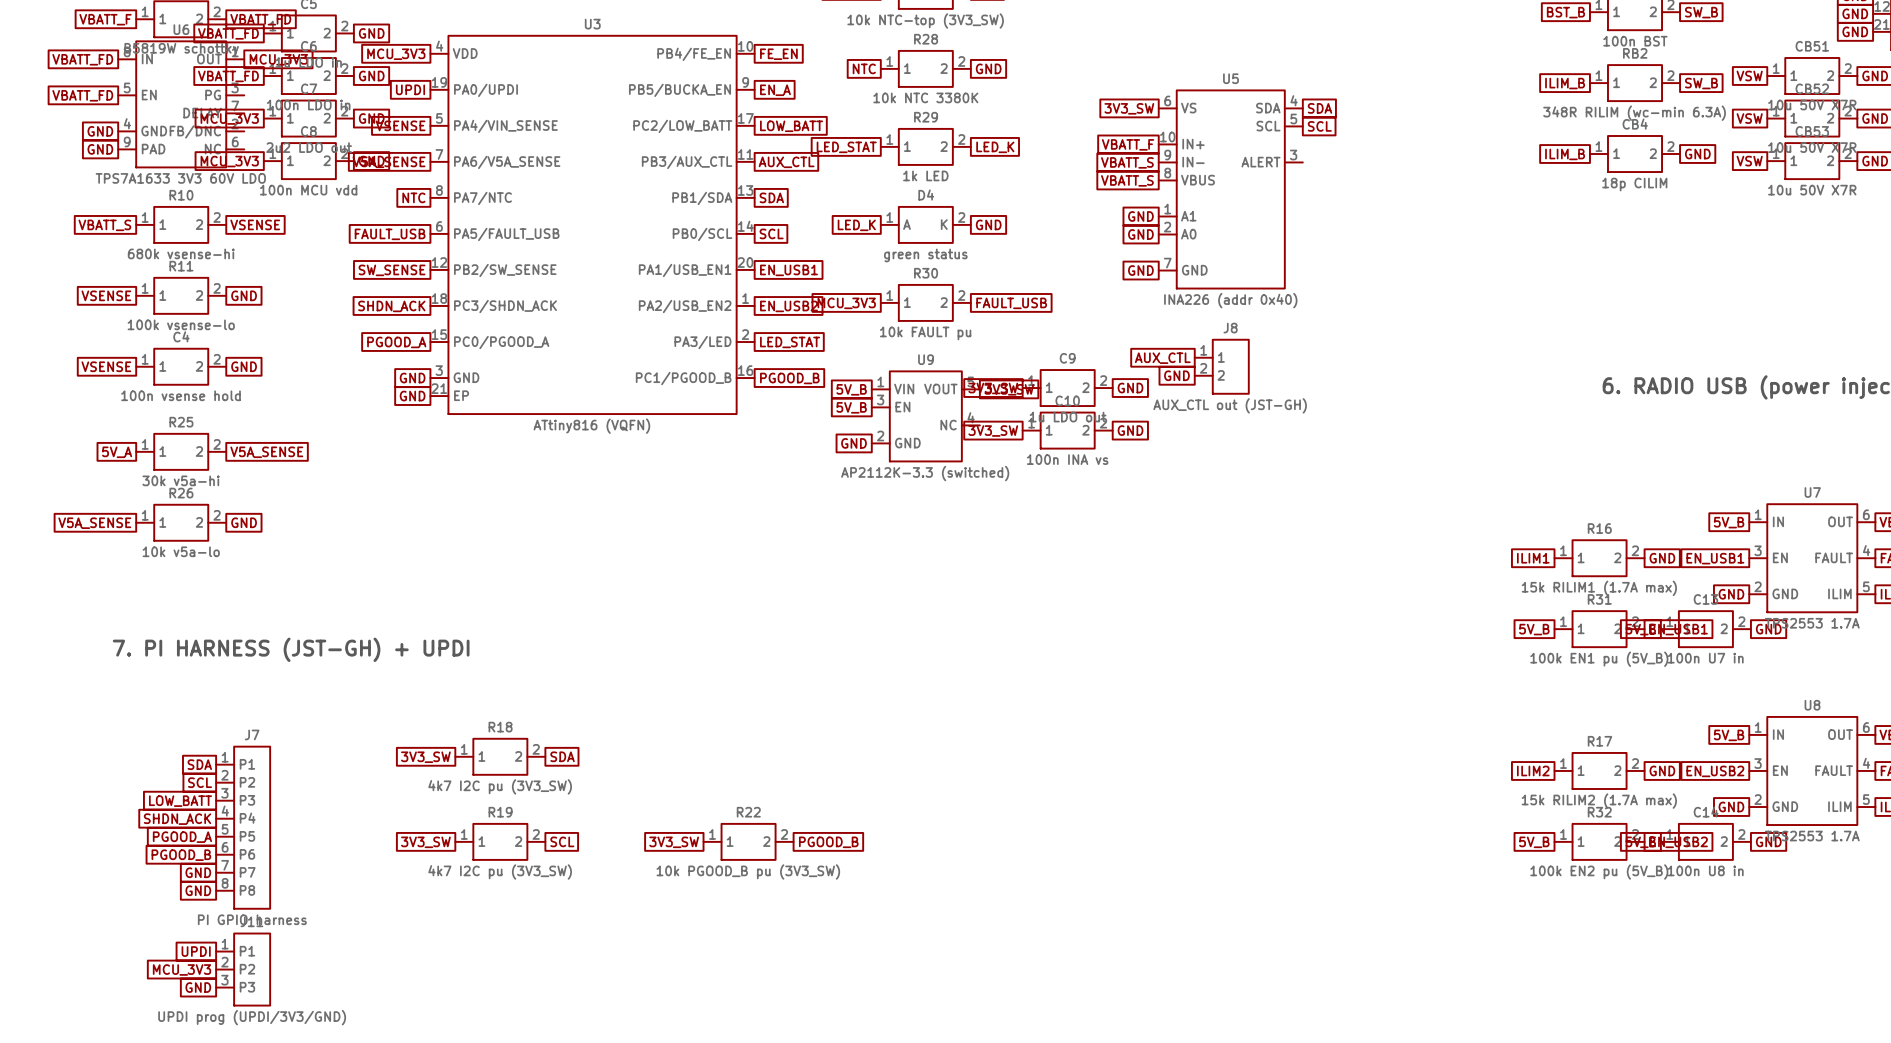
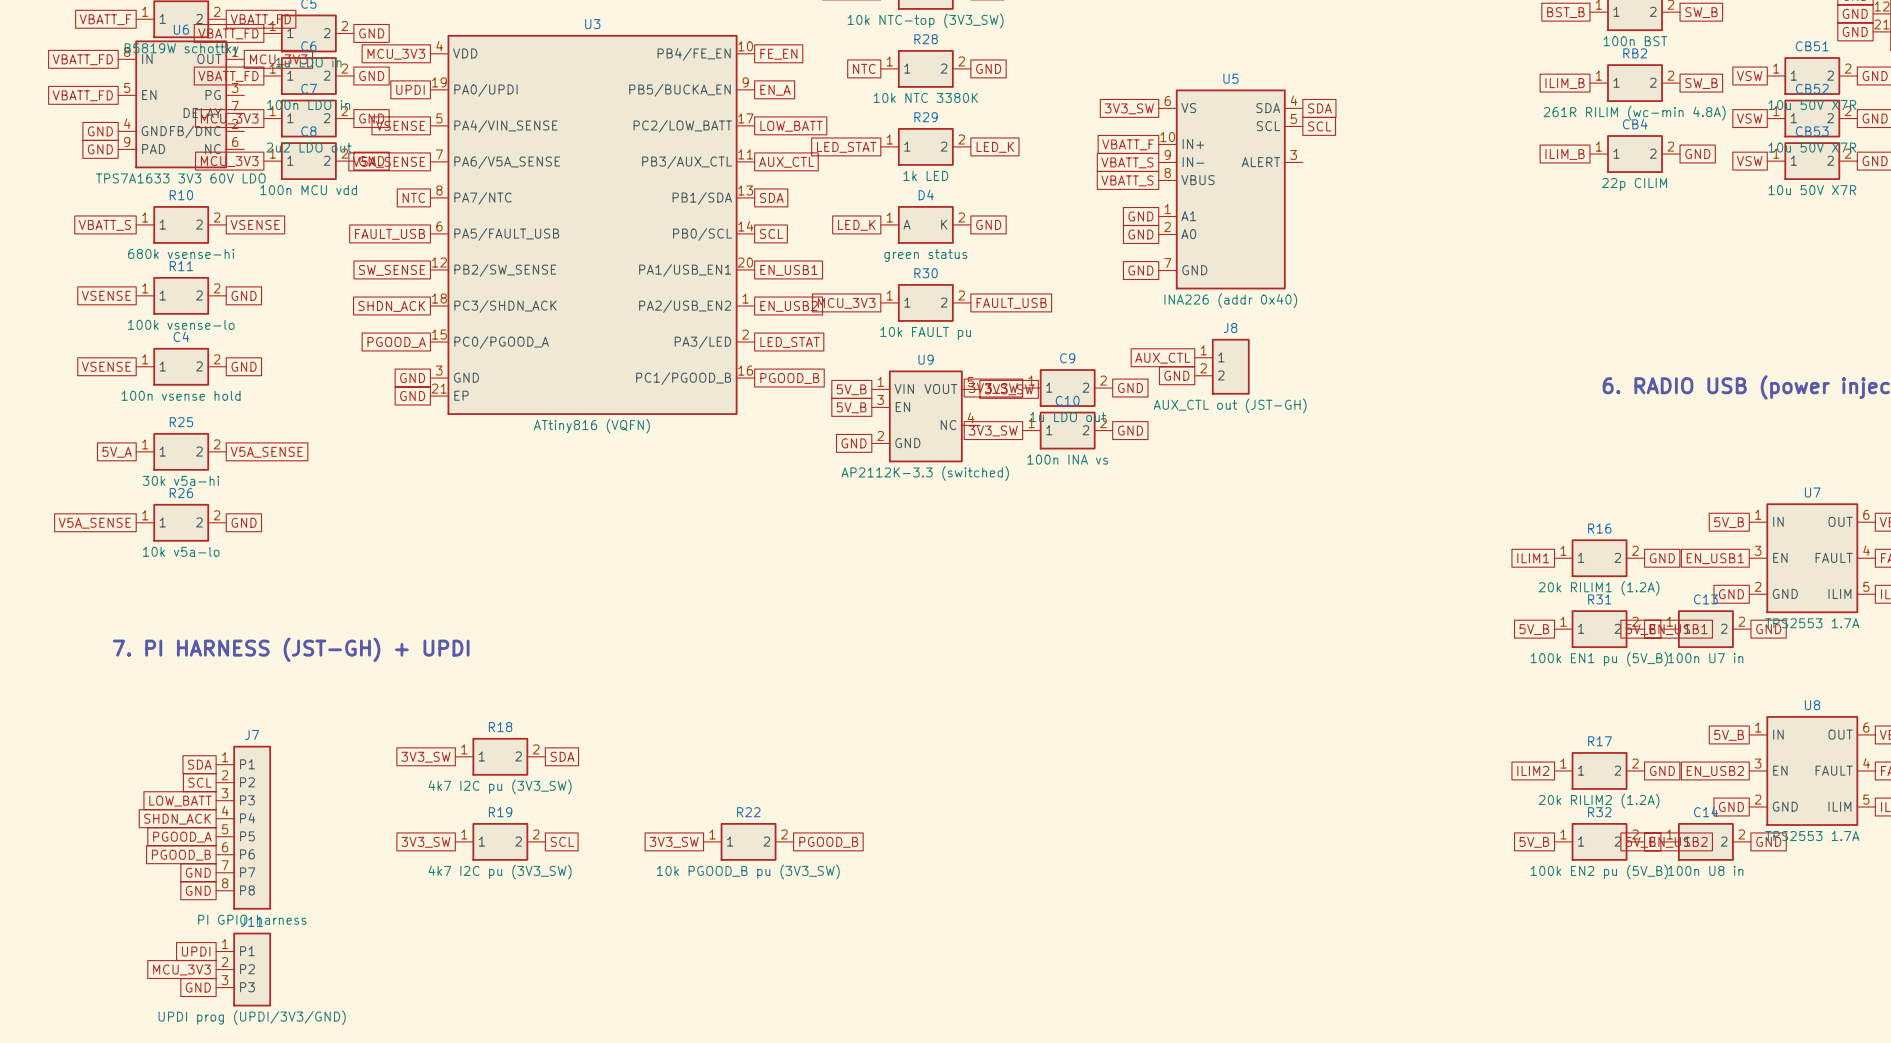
RB2 value: 348R RILIM (wc-min 6.3A) (1634, 113) -> 261R RILIM (wc-min 4.8A) (1634, 113)
CB4 value: 18p CILIM (1634, 184) -> 22p CILIM (1634, 184)
R16 value: 15k RILIM1 (1.7A max) (1599, 588) -> 20k RILIM1 (1.2A) (1599, 588)
R17 value: 15k RILIM2 (1.7A max) (1599, 801) -> 20k RILIM2 (1.2A) (1599, 801)

